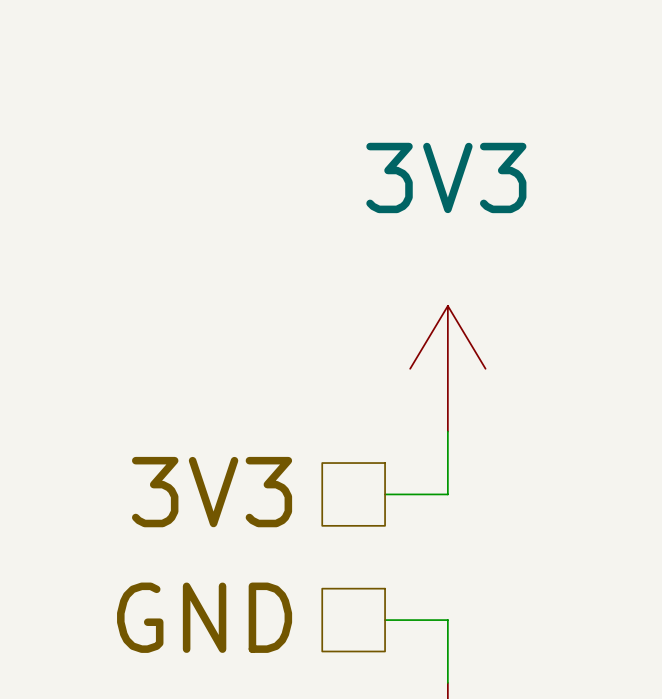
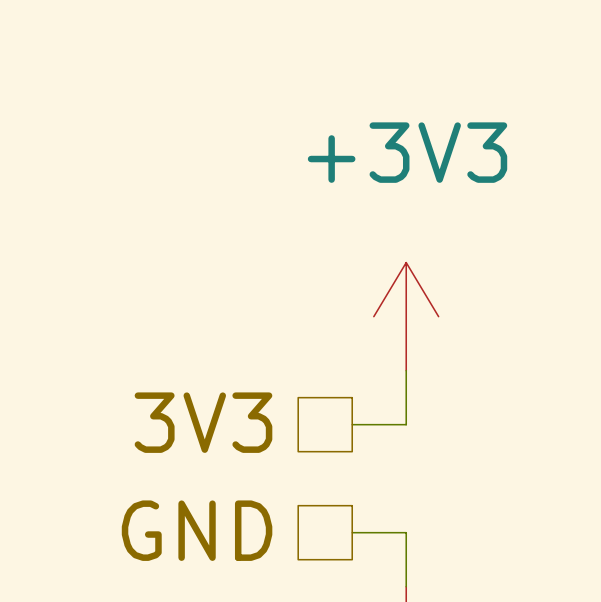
power symbol: 3V3 (447, 368) -> +3V3 (406, 316)

